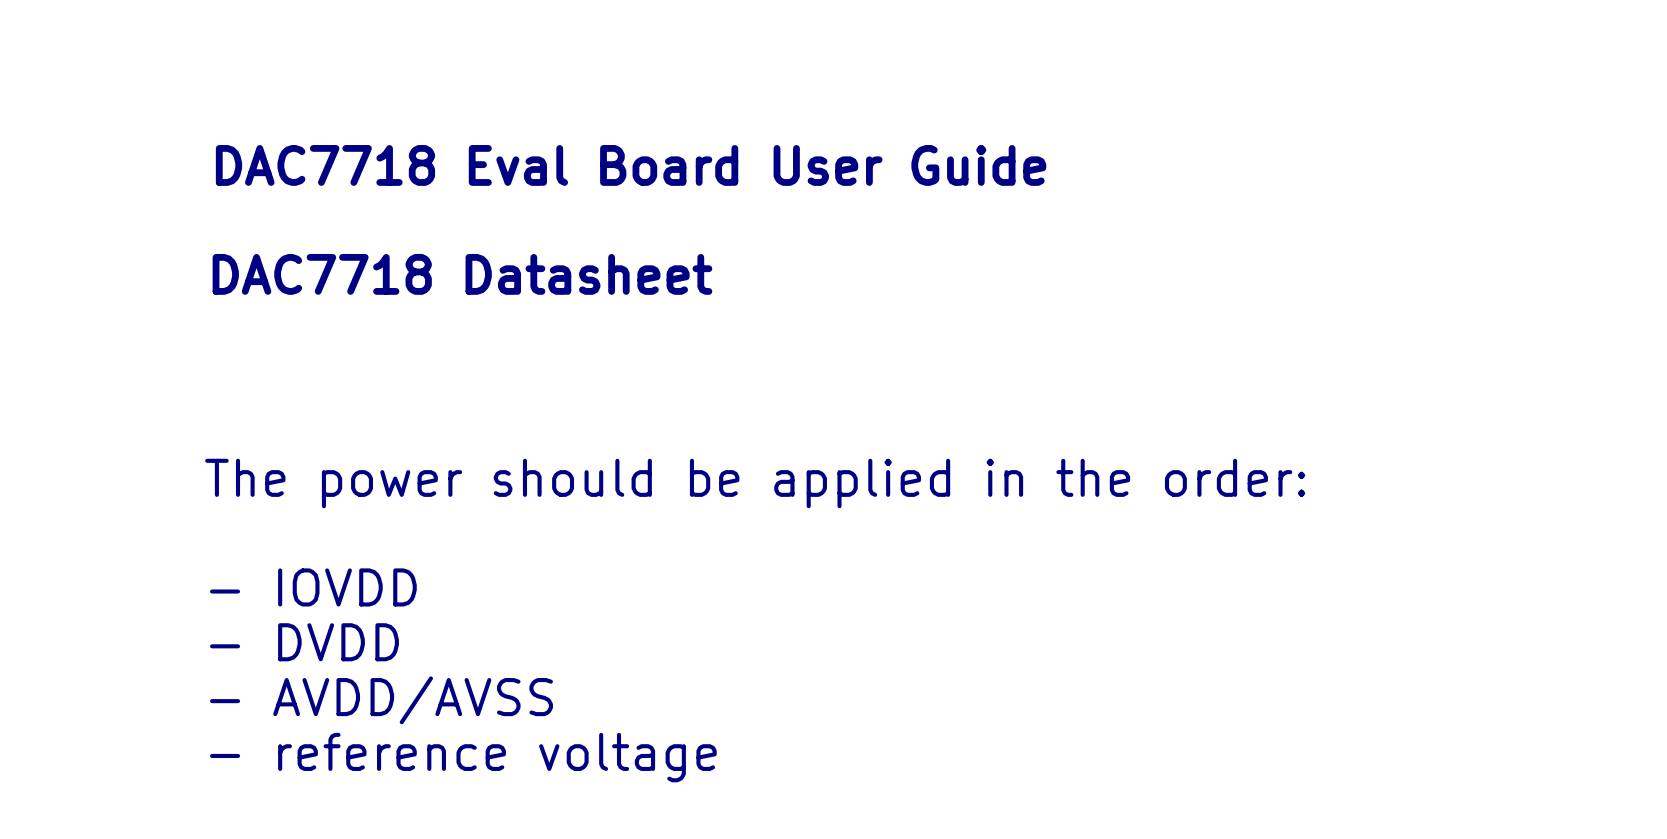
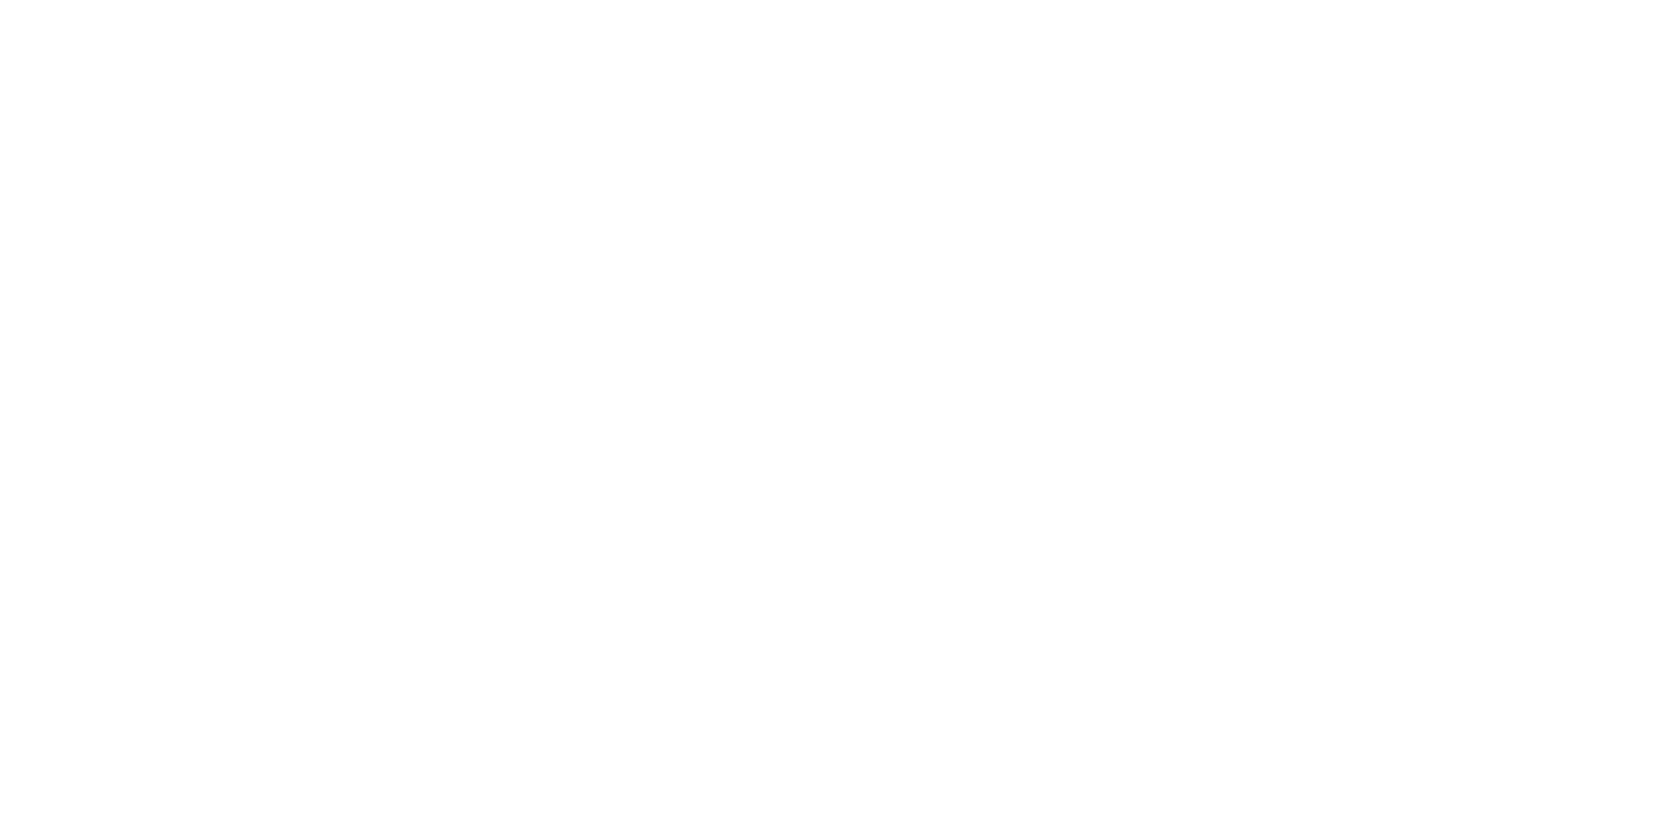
text: DAC7718 Eval Board User Guide (631, 165) -> none
text: DAC7718 Datasheet (462, 274) -> none
text: The power should be applied in the order: (755, 483) -> none
text: - IOVDD (313, 587) -> none
text: - DVDD (304, 642) -> none
text: - AVDD/AVSS (381, 700) -> none
text: - reference voltage (463, 757) -> none

